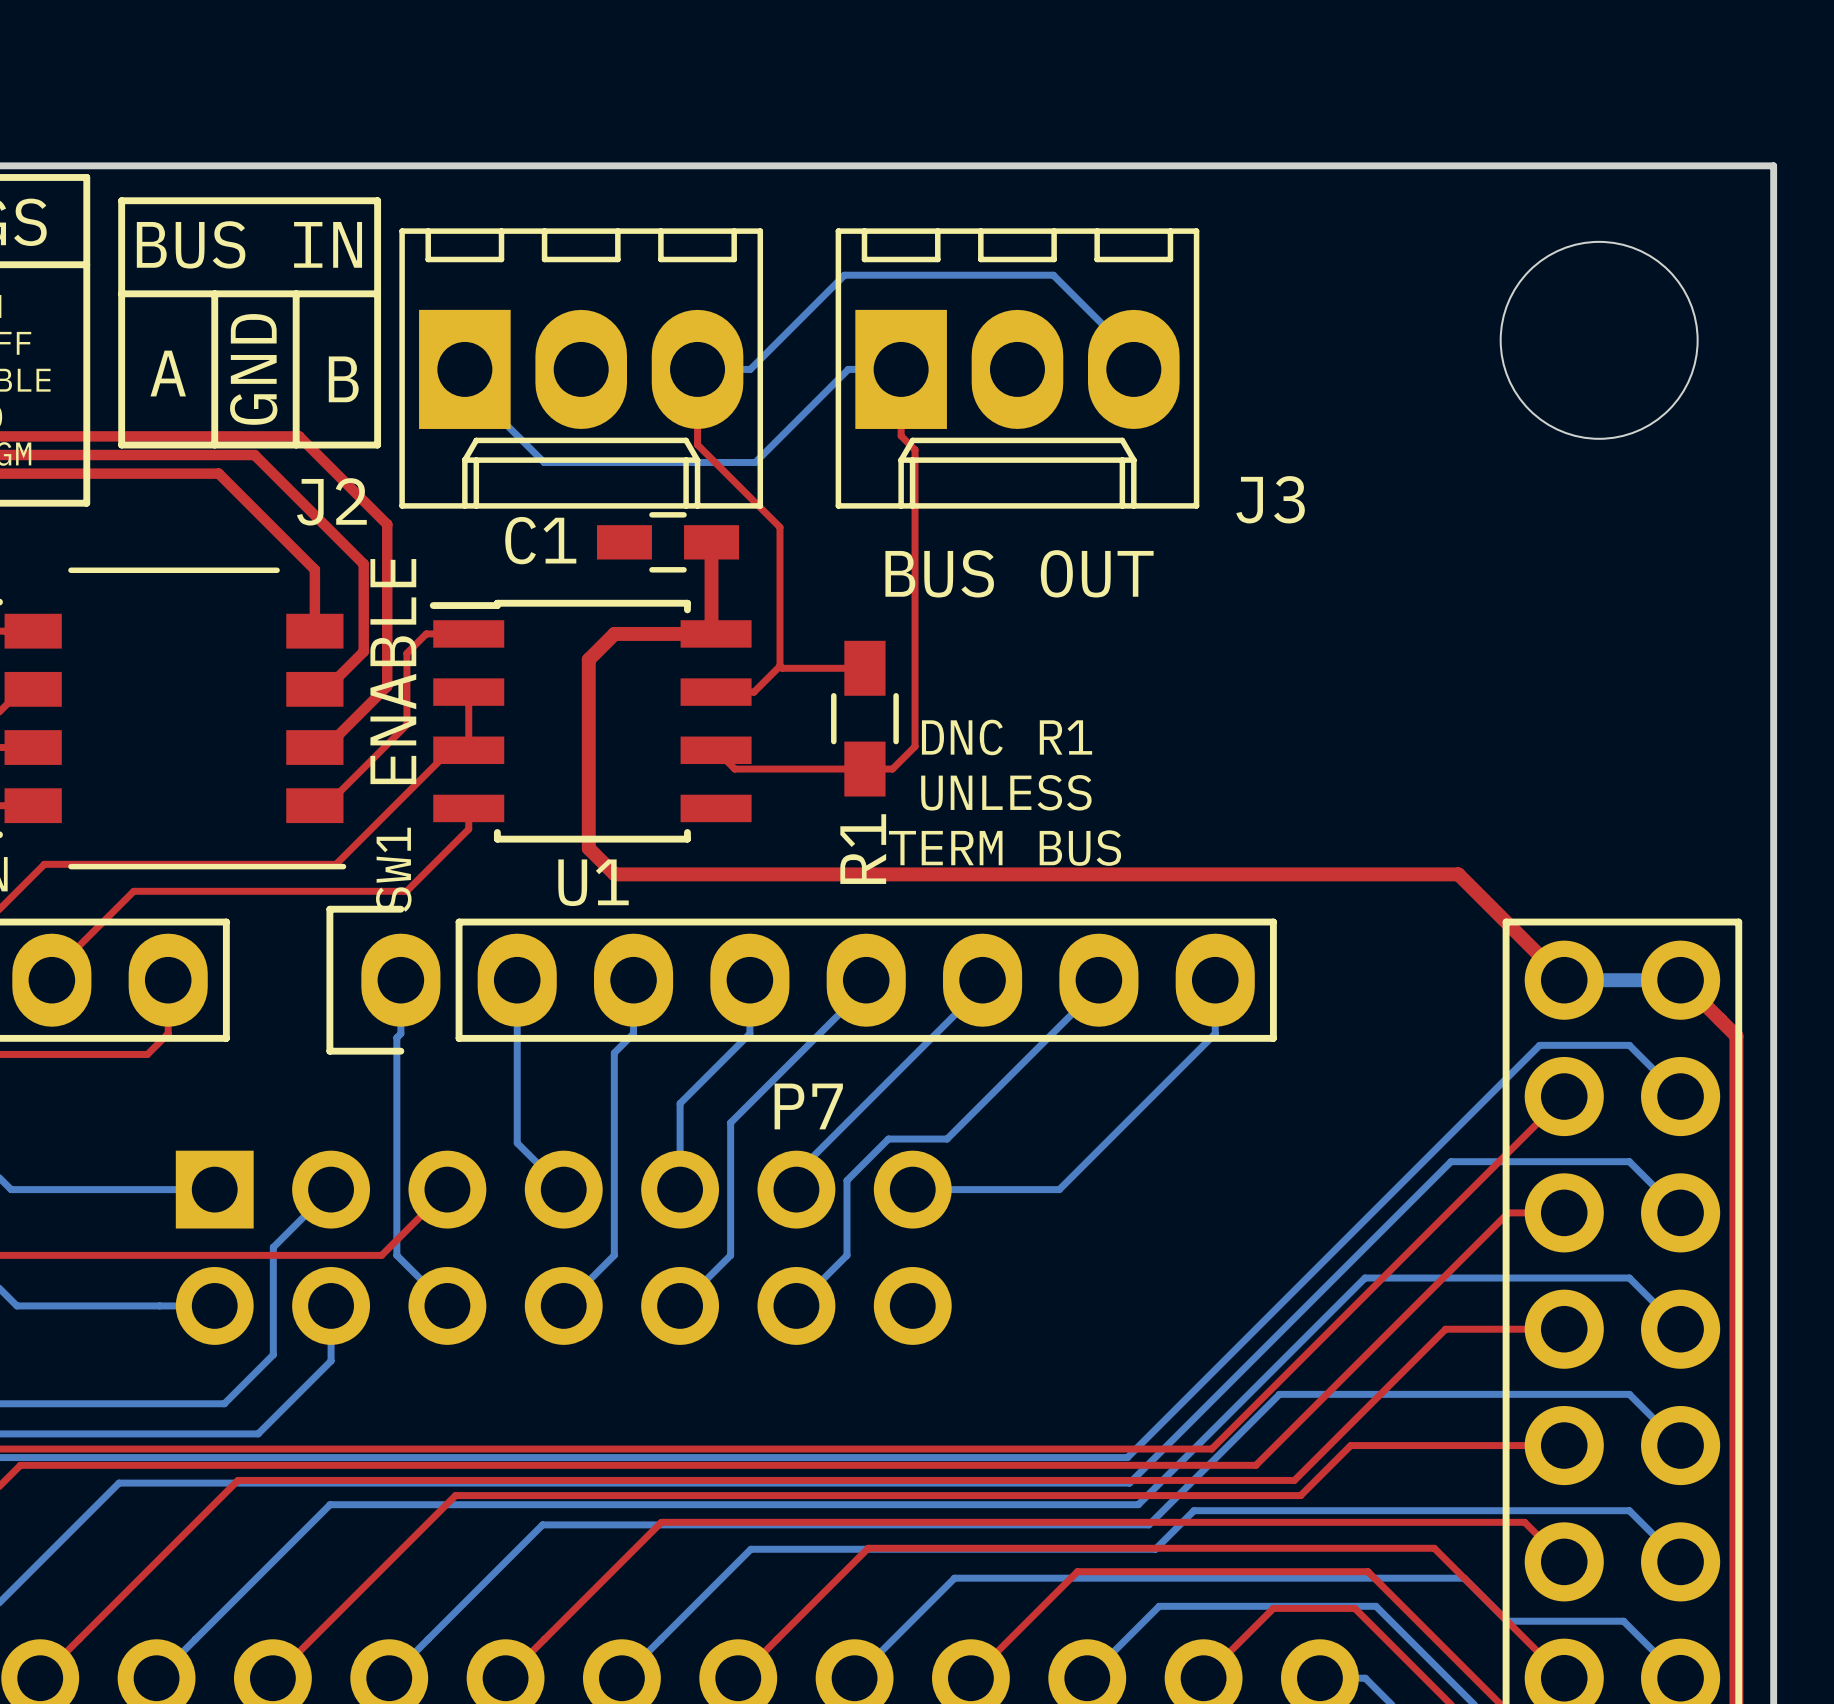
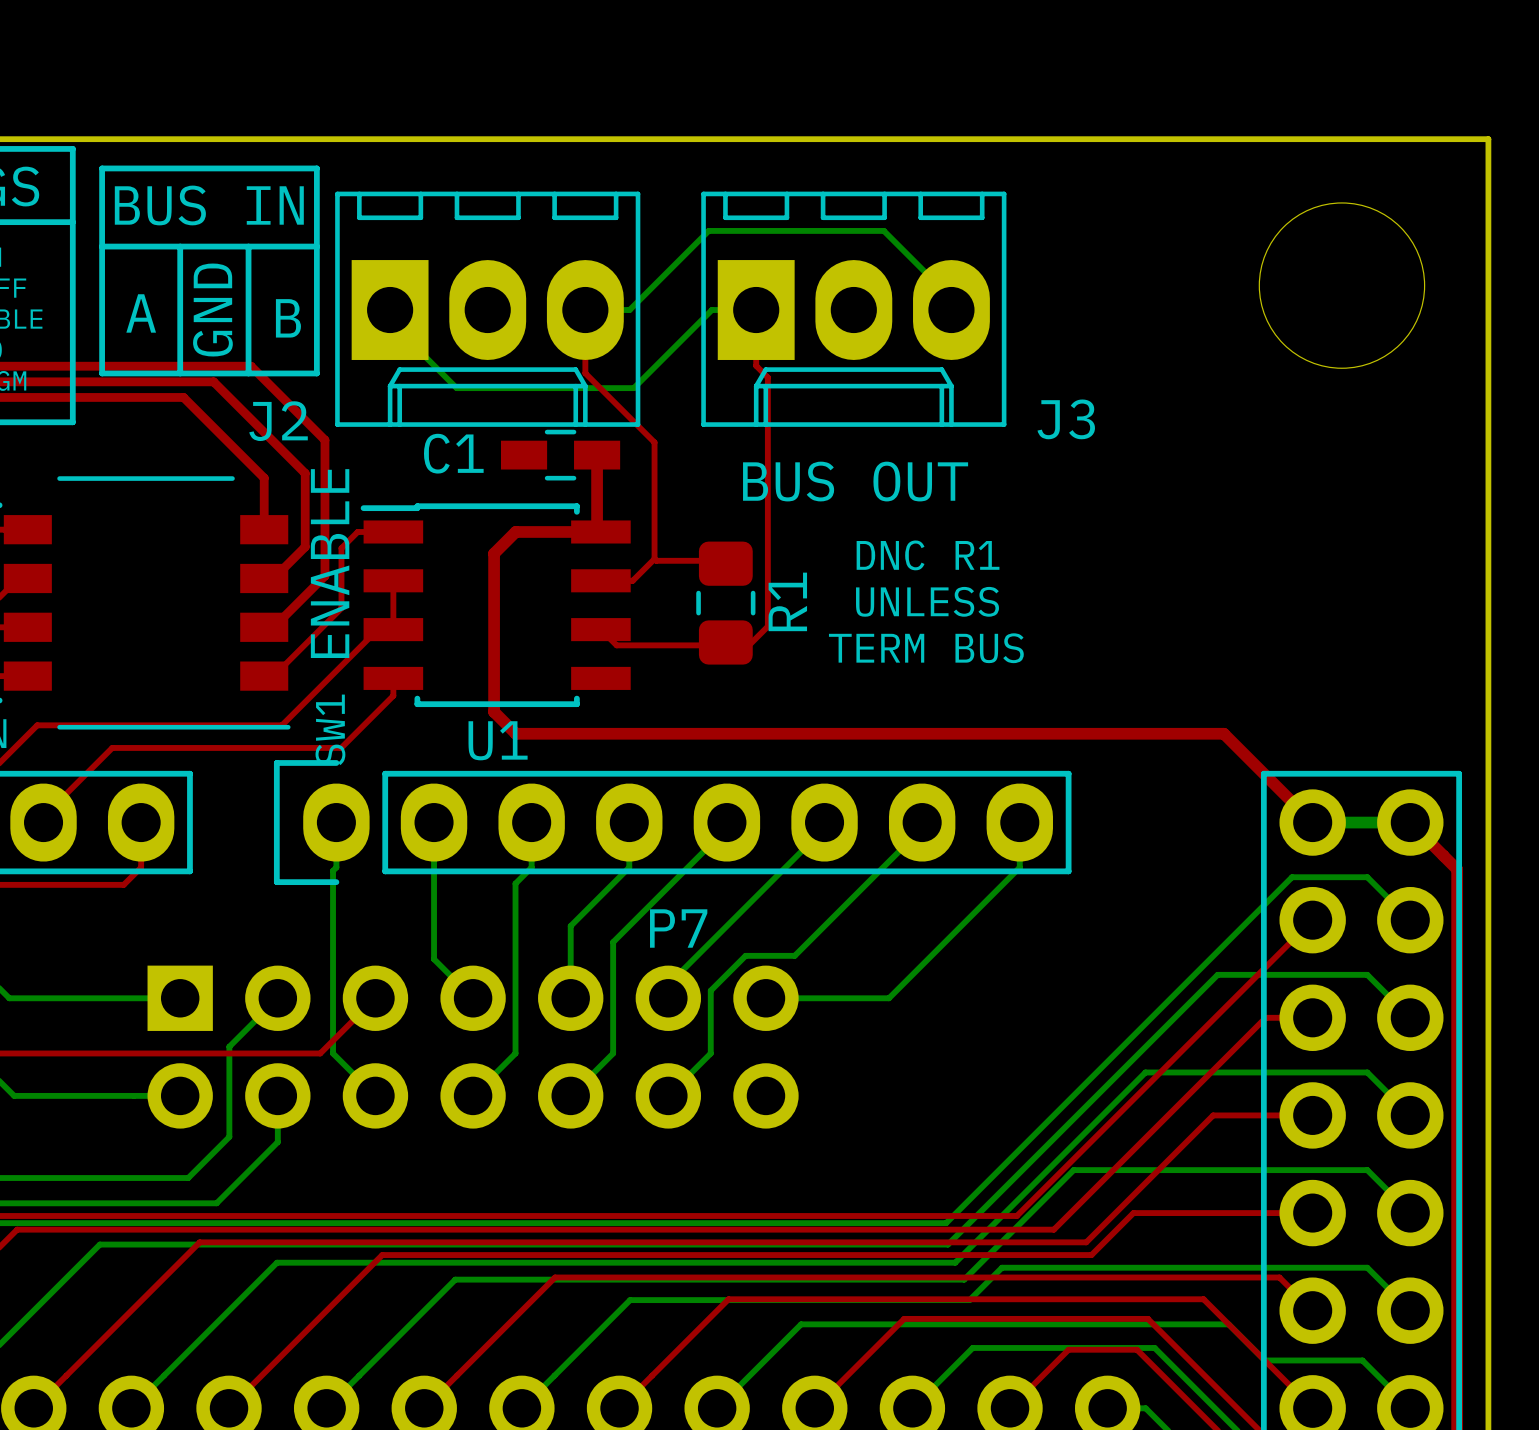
R1 footprint: [831, 640, 899, 797] -> [696, 541, 756, 665]
text position: DNC R1 (1007, 737) -> DNC R1 (928, 555)
text position: UNLESS (1006, 792) -> UNLESS (927, 601)
text position: TERM BUS (1005, 848) -> TERM BUS (926, 648)
R1 name position: R1 (863, 849) -> R1 (787, 601)

